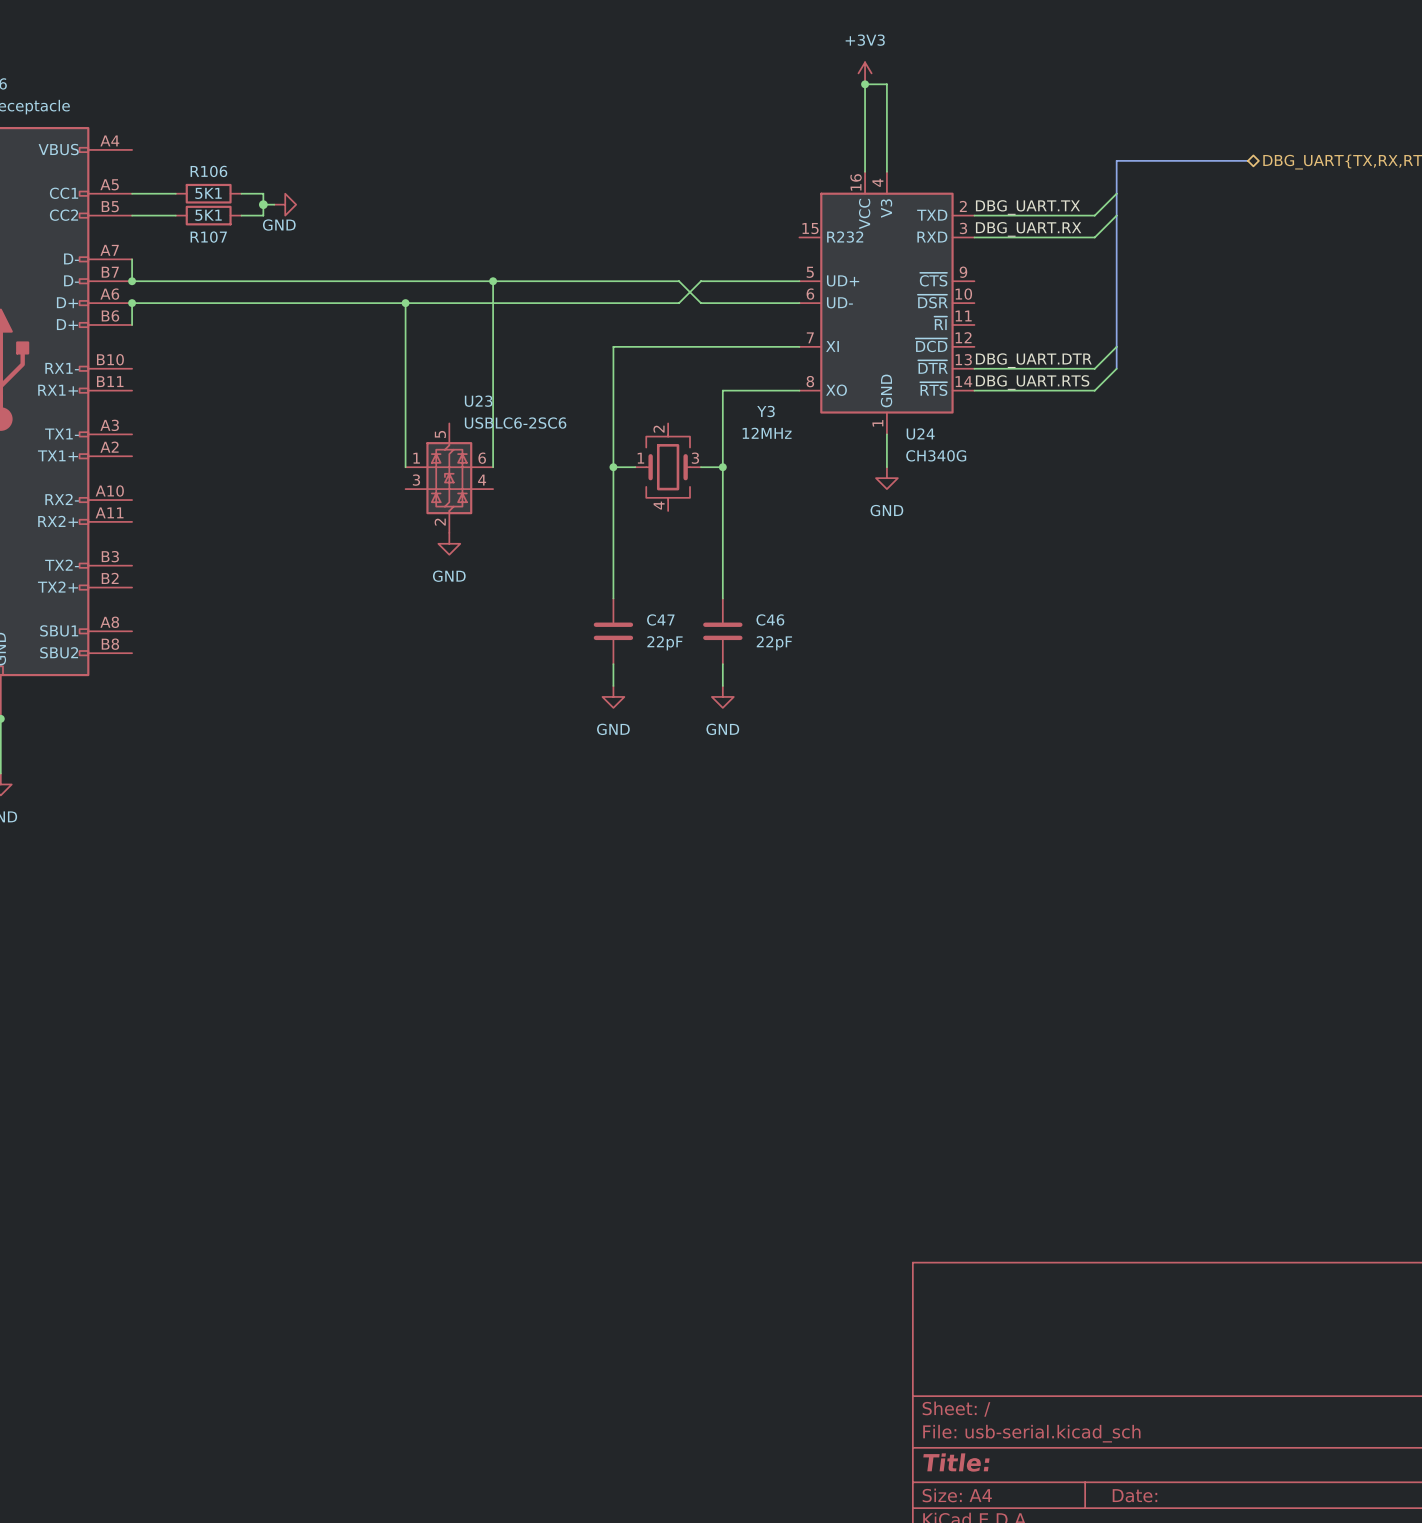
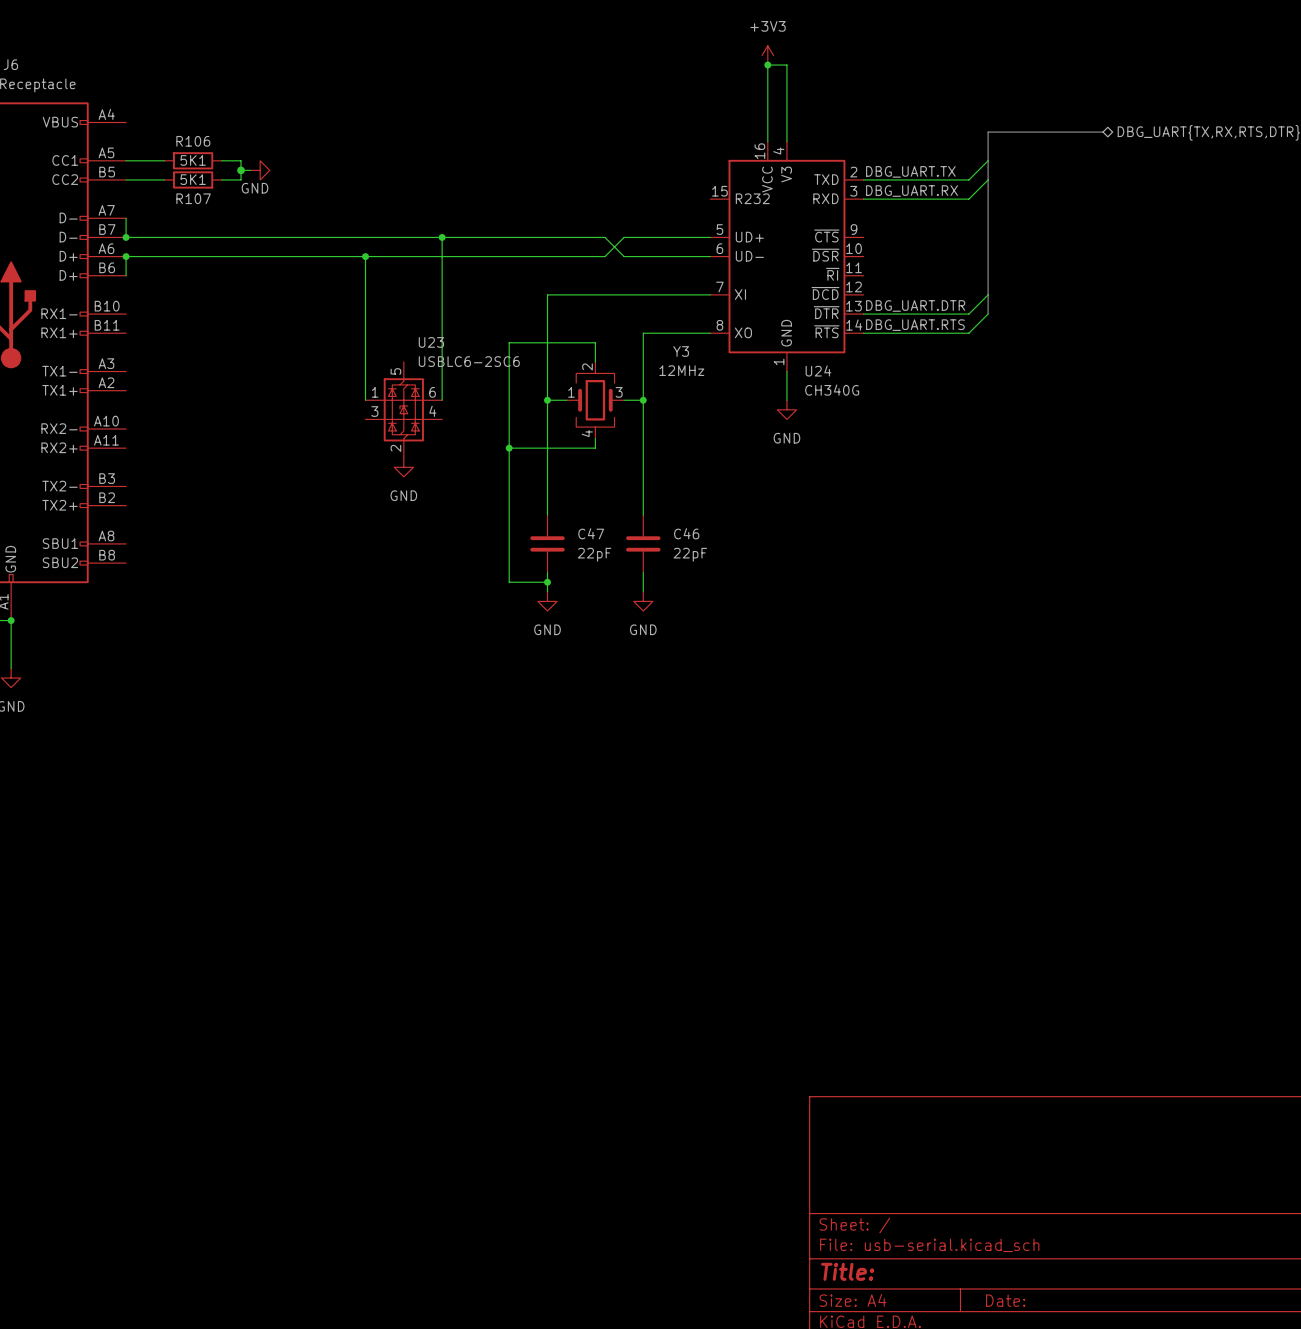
wire: none -> (595, 361) (595, 342) (509, 342) (509, 582) (547, 582)
wire: none -> (595, 438) (595, 448) (509, 448)
junction: none -> (509, 448)
junction: none -> (547, 582)

